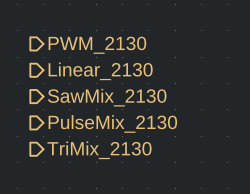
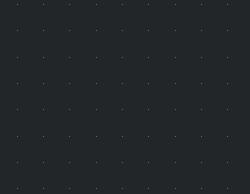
hierarchical label: PWM_2130 (97, 45) -> none
hierarchical label: Linear_2130 (100, 71) -> none
hierarchical label: SawMix_2130 (107, 97) -> none
hierarchical label: PulseMix_2130 (112, 123) -> none
hierarchical label: TriMix_2130 (99, 150) -> none

